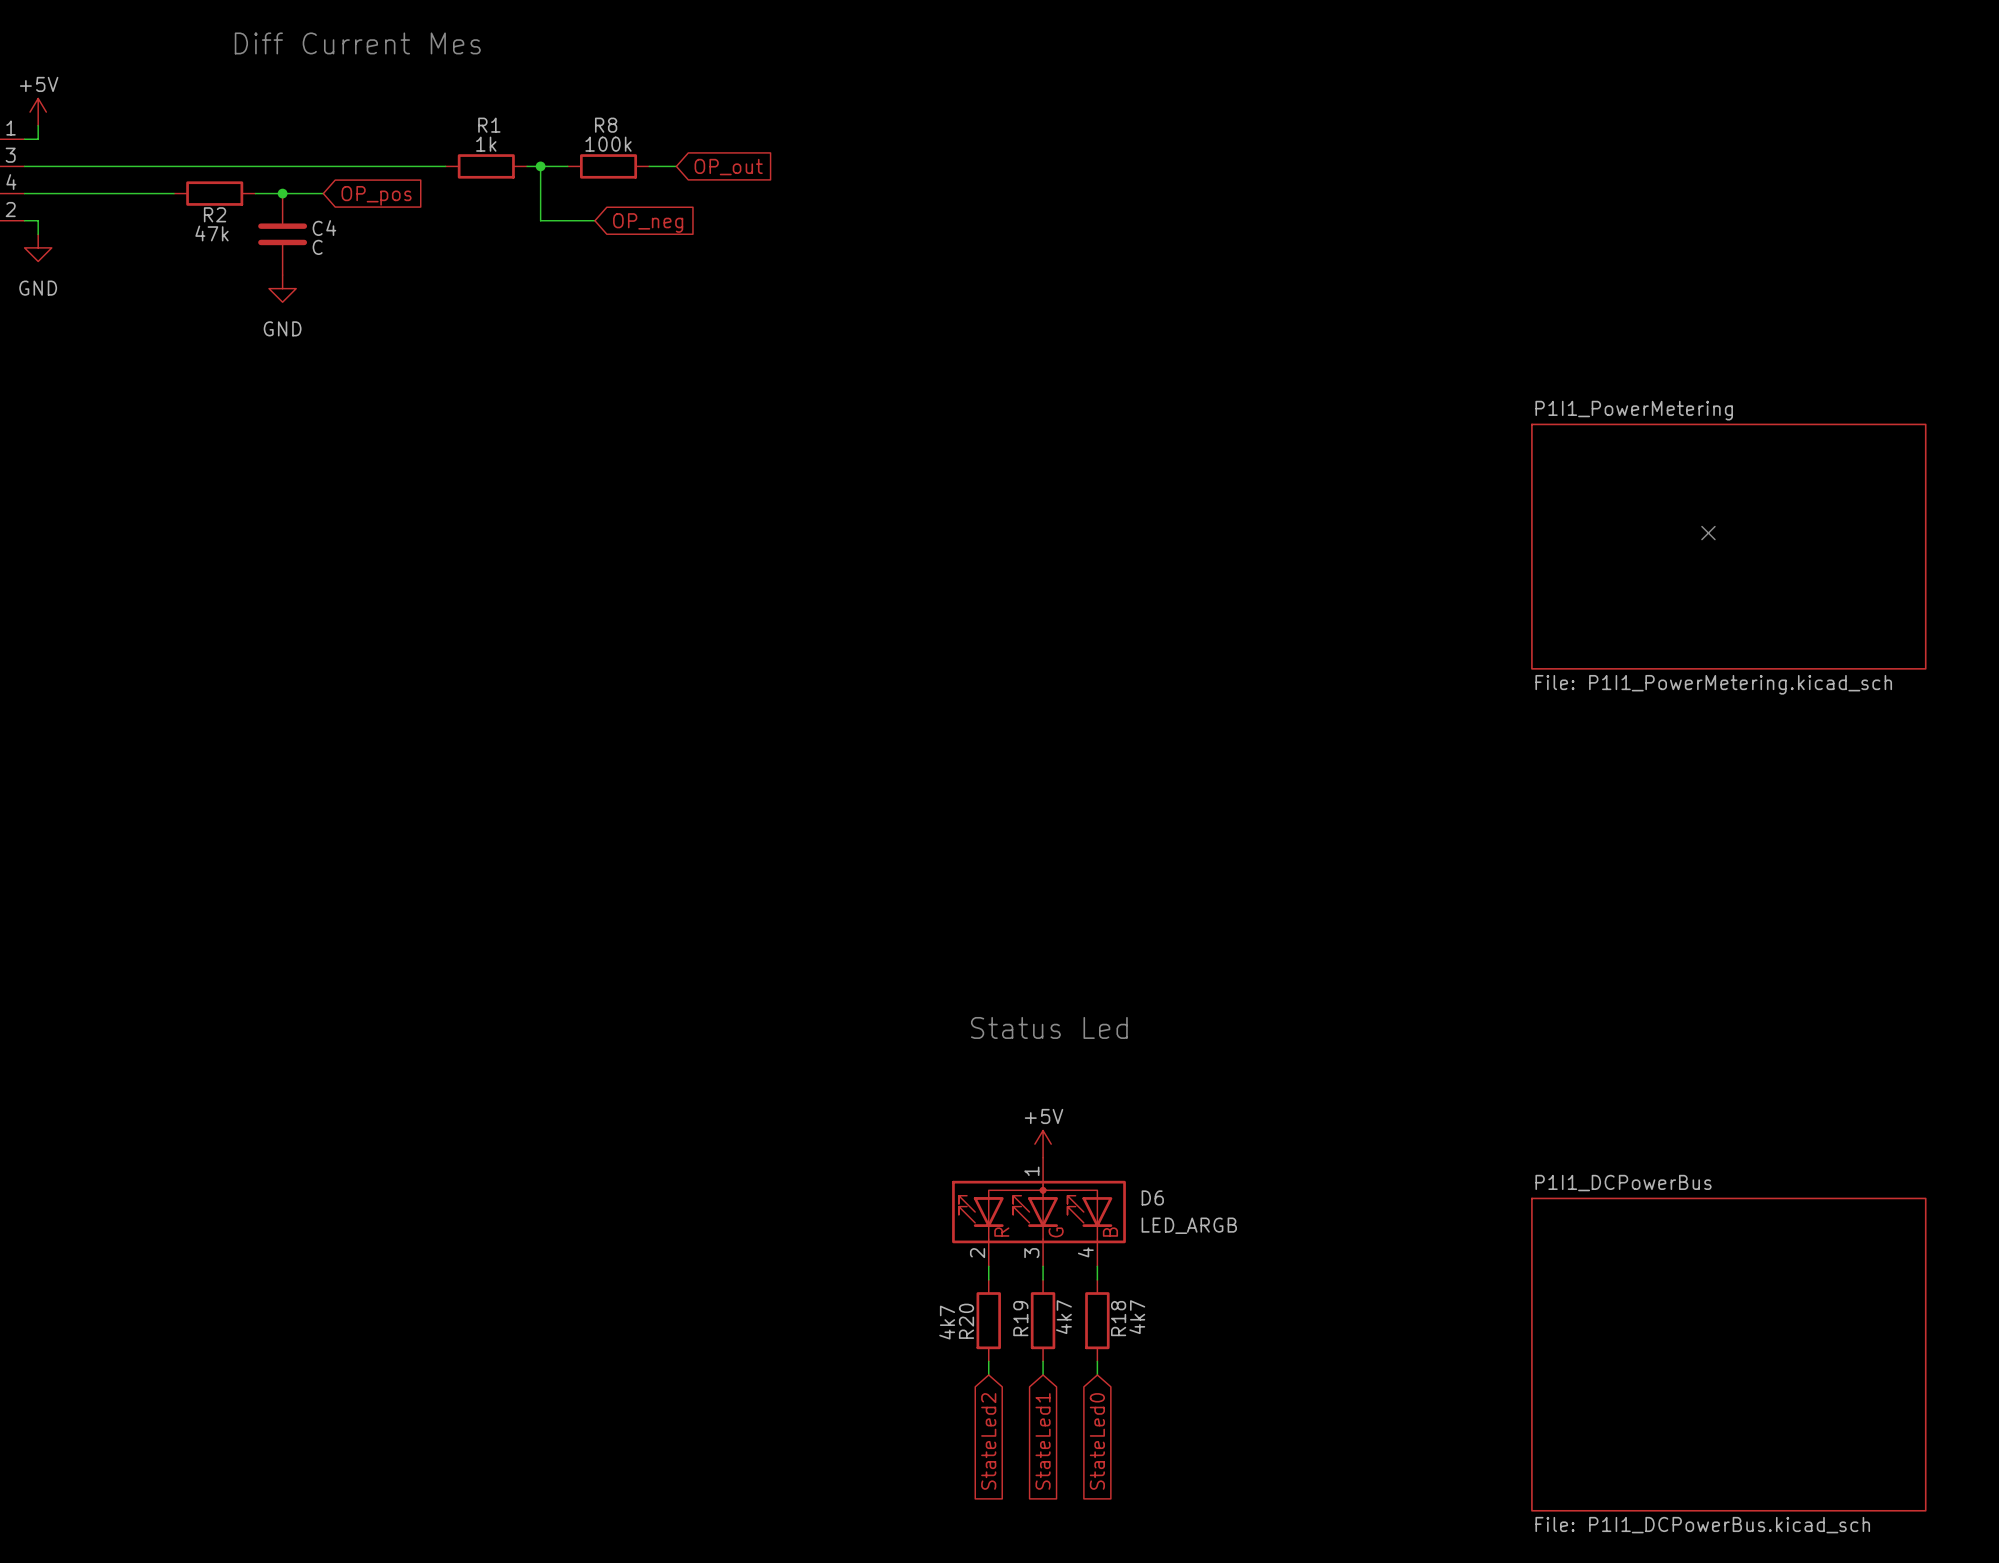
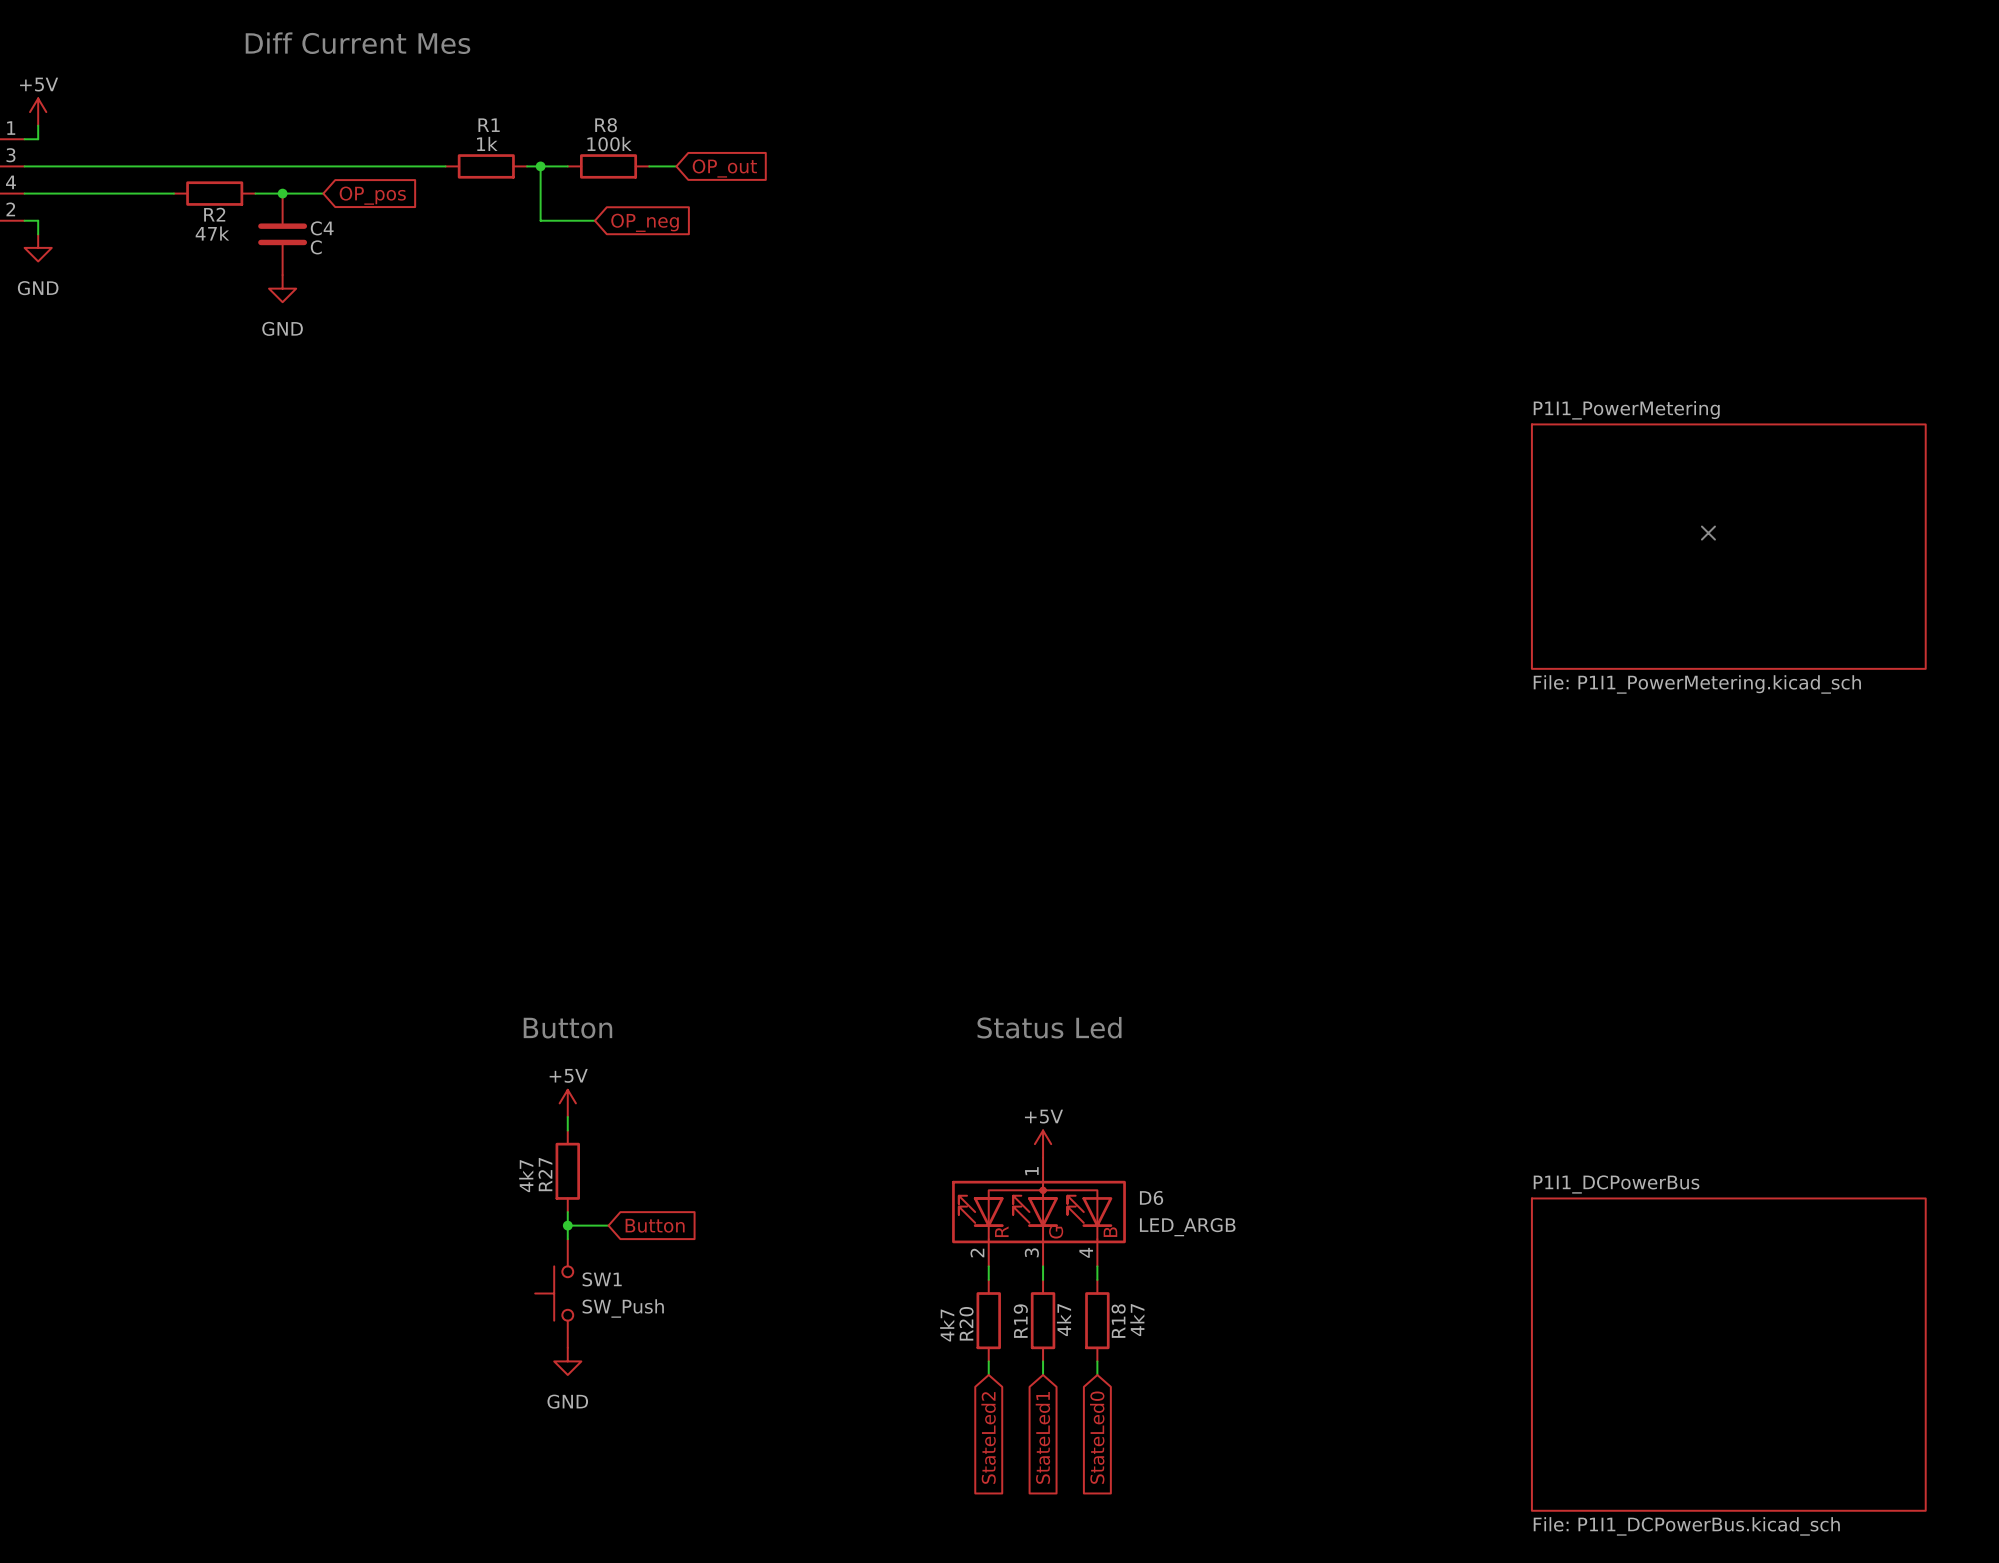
text: none -> Button (567, 1028)
power symbol: none -> +5V (567, 1103)
wire: none -> (567, 1116) (567, 1130)
R27: none -> 4k7 (567, 1171)
wire: none -> (567, 1212) (567, 1239)
wire: none -> (567, 1225) (608, 1225)
junction: none -> (567, 1225)
global label: none -> Button (655, 1225)
SW1: none -> SW_Push (554, 1293)
power symbol: none -> GND (567, 1361)

